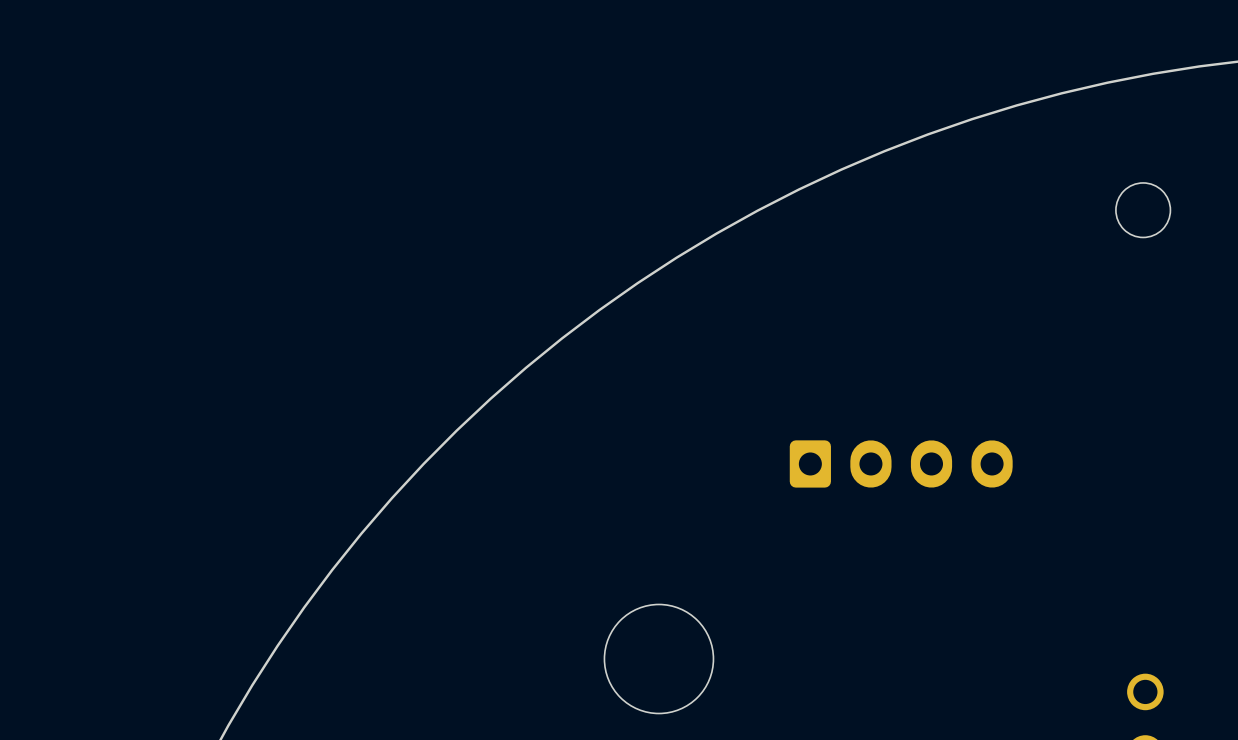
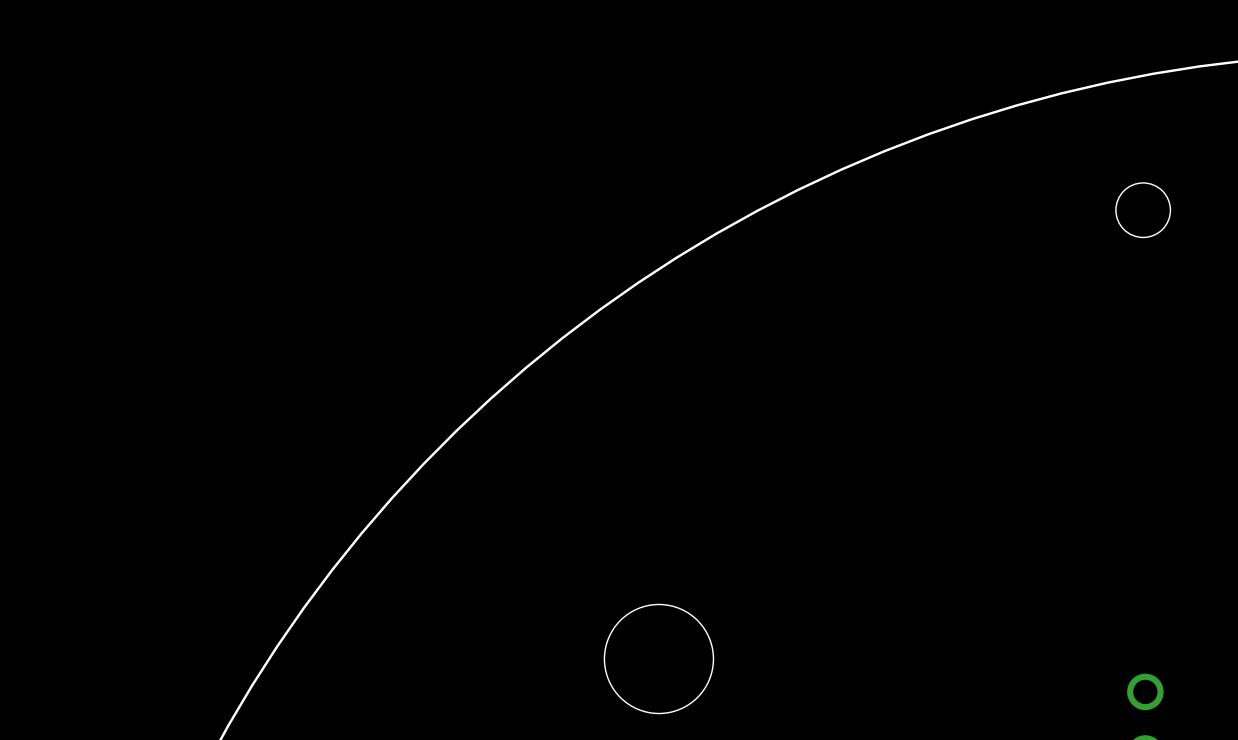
part: (901, 463) -> none

